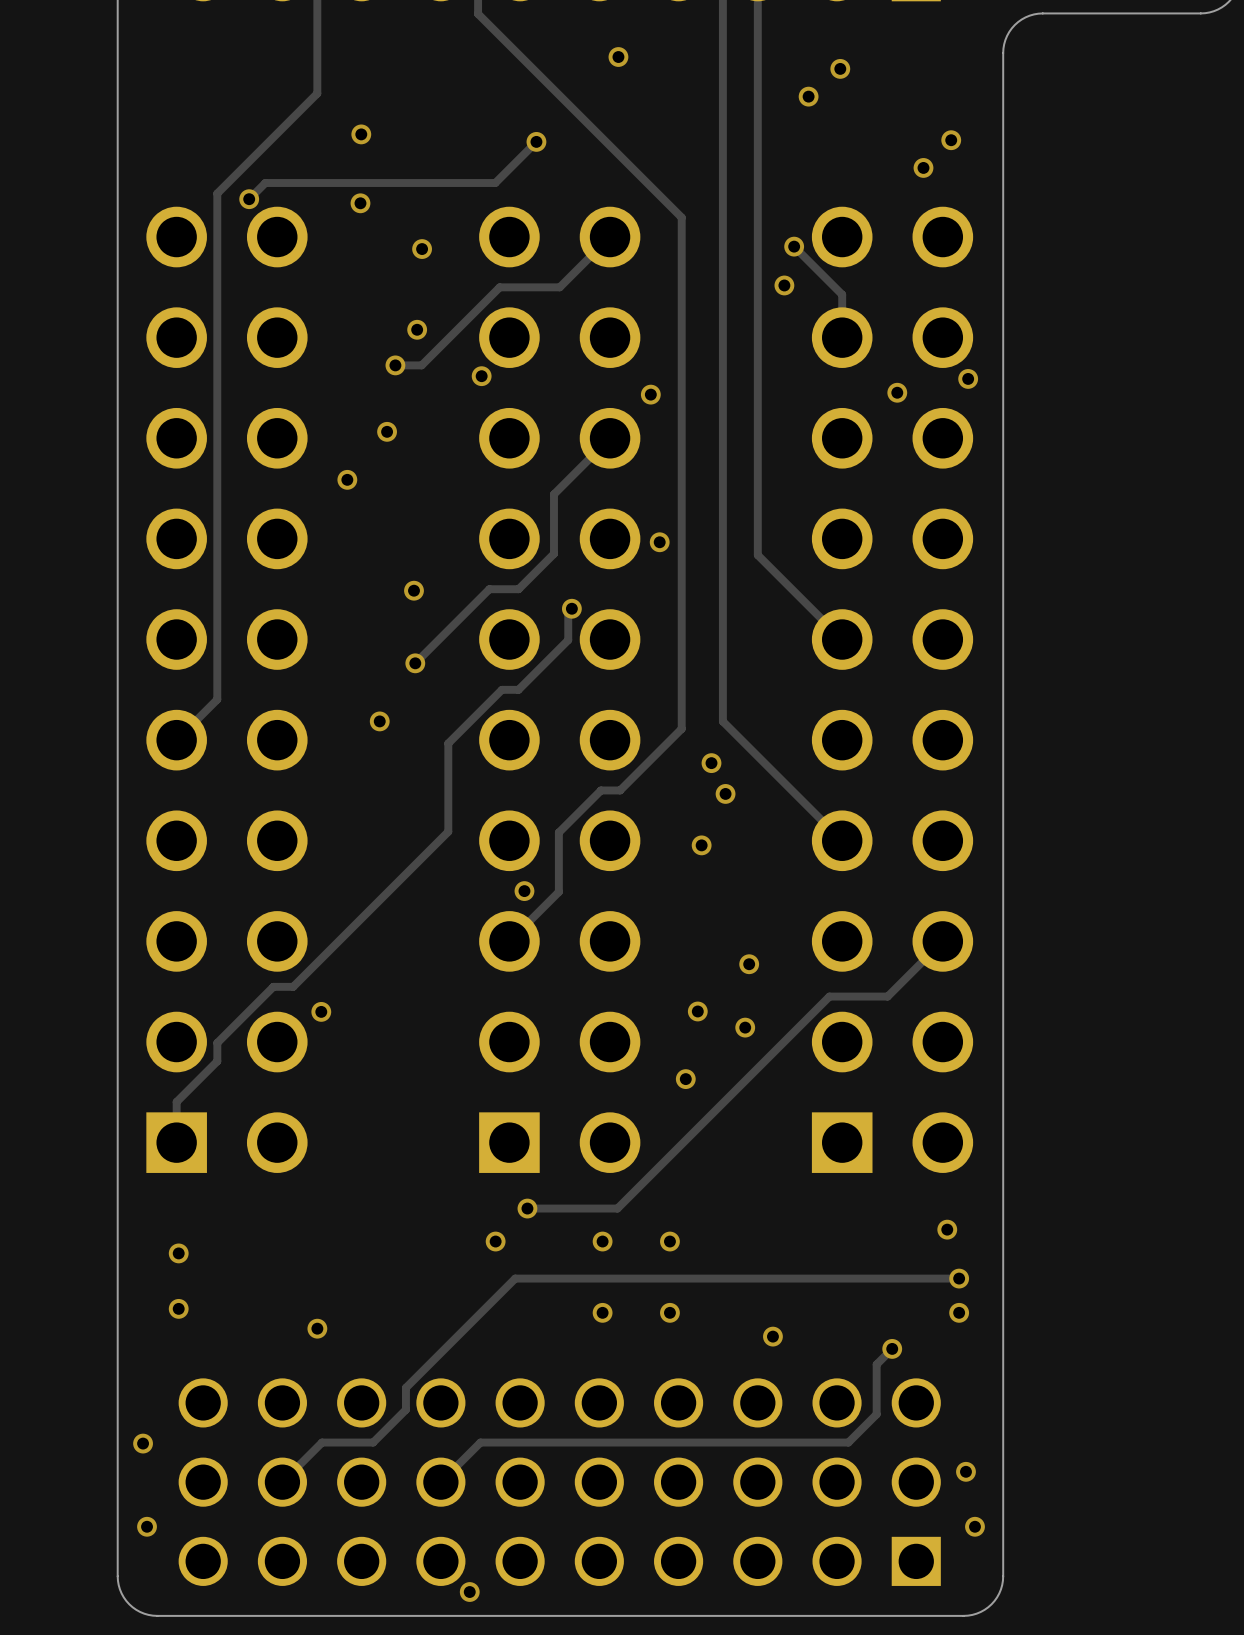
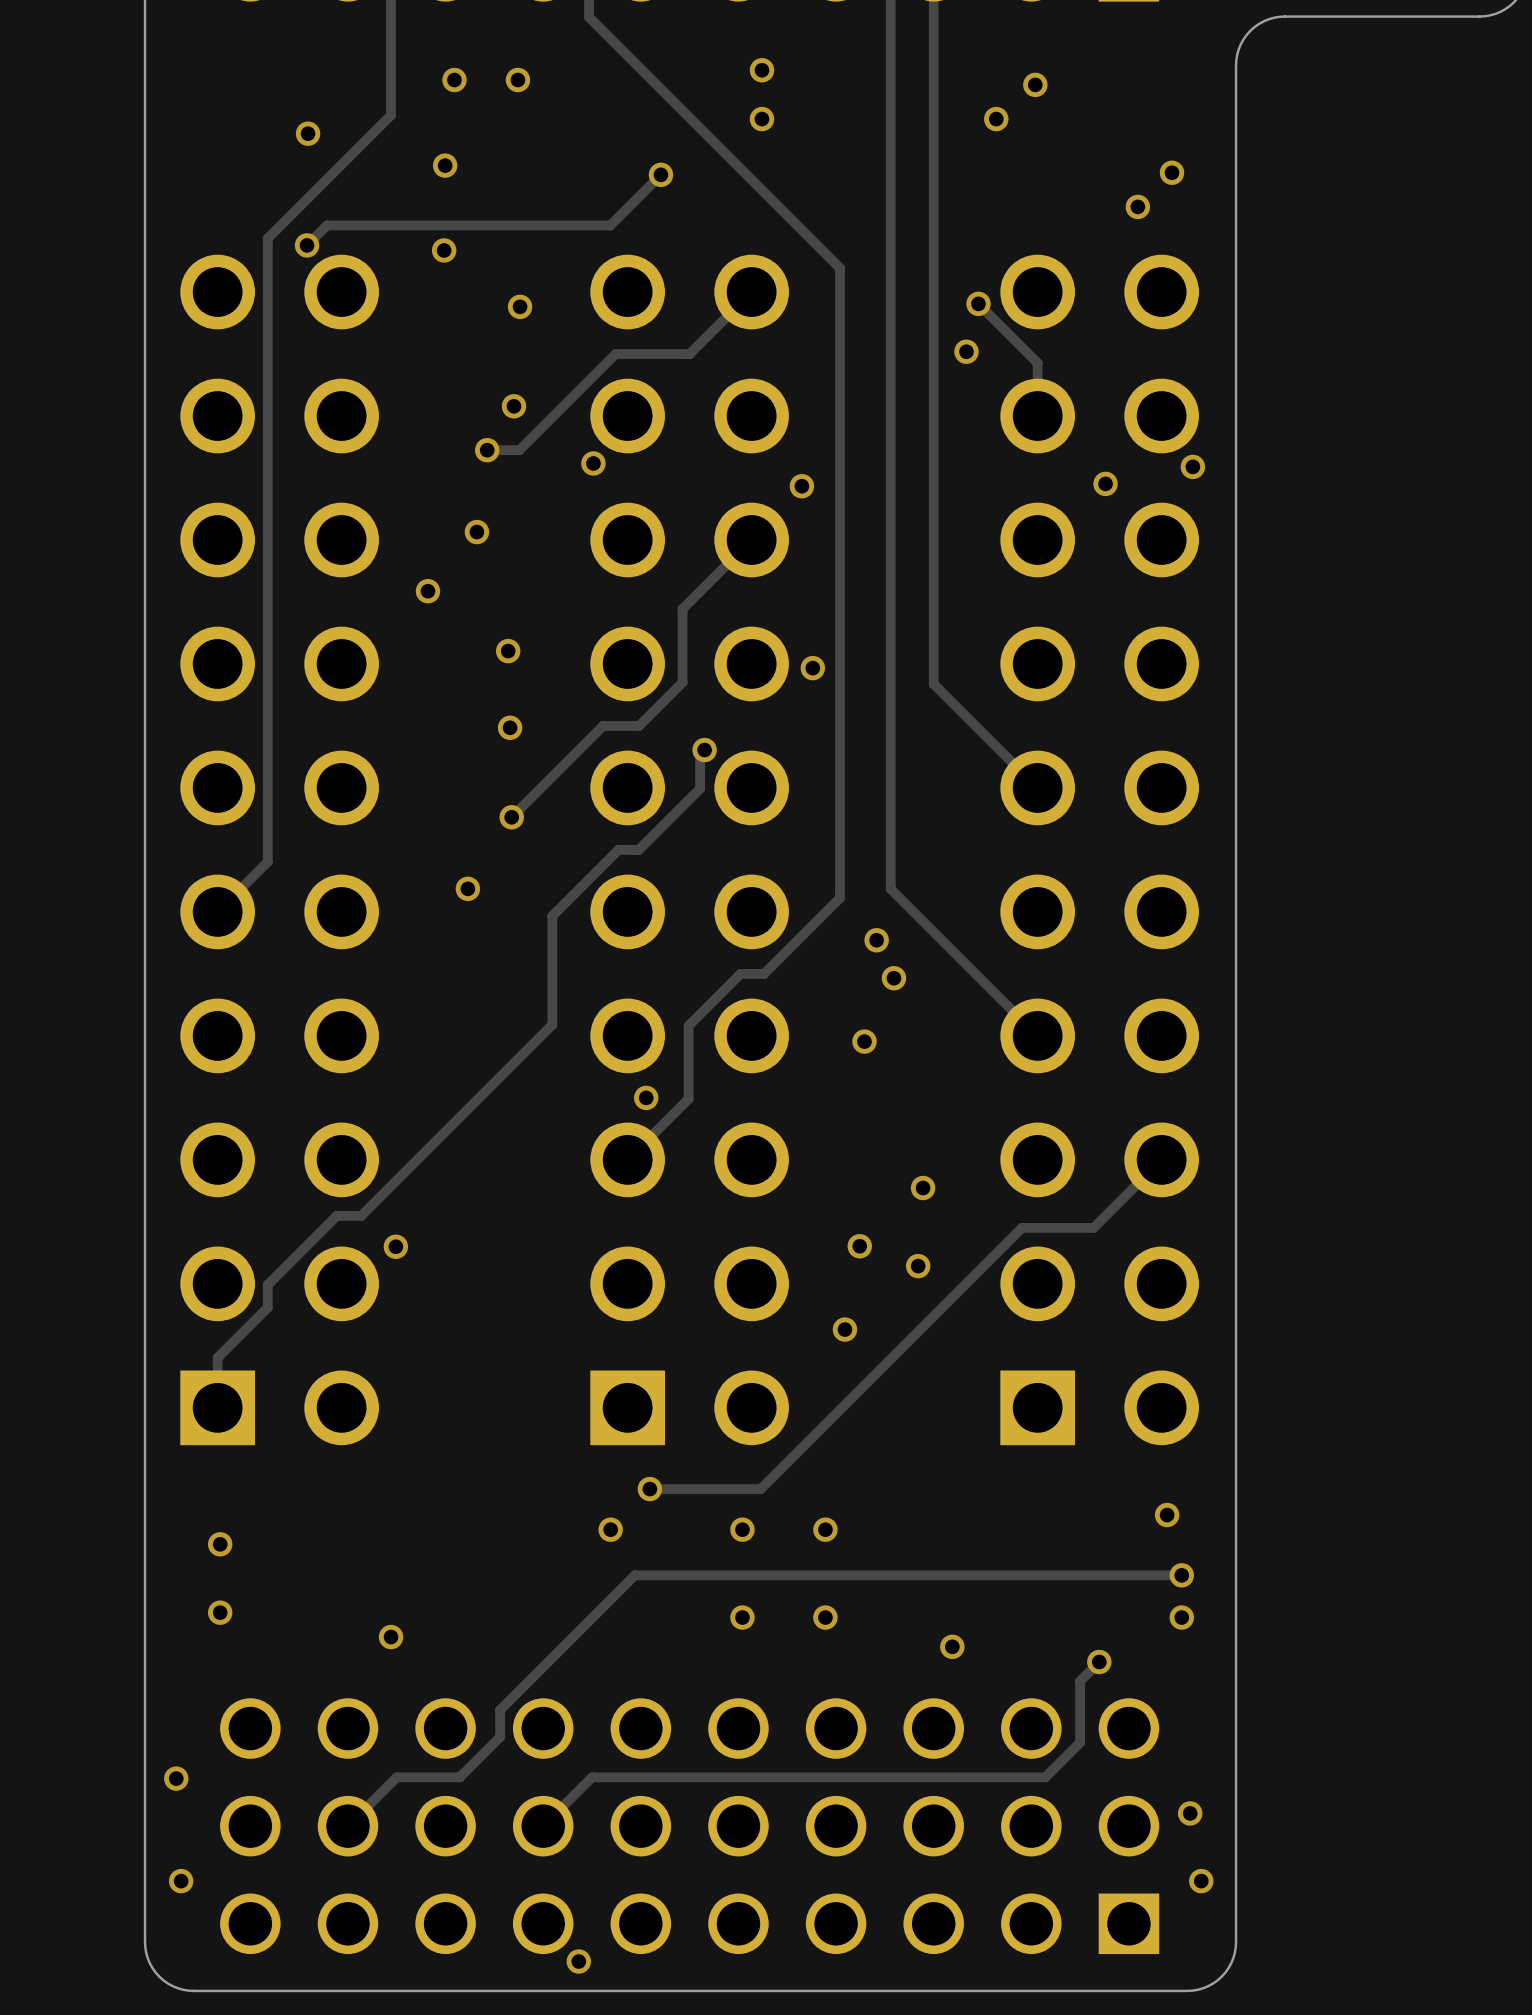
via: none -> (454, 80)
via: none -> (517, 80)
via: none -> (761, 119)
via: none -> (308, 133)
via: none -> (508, 651)

